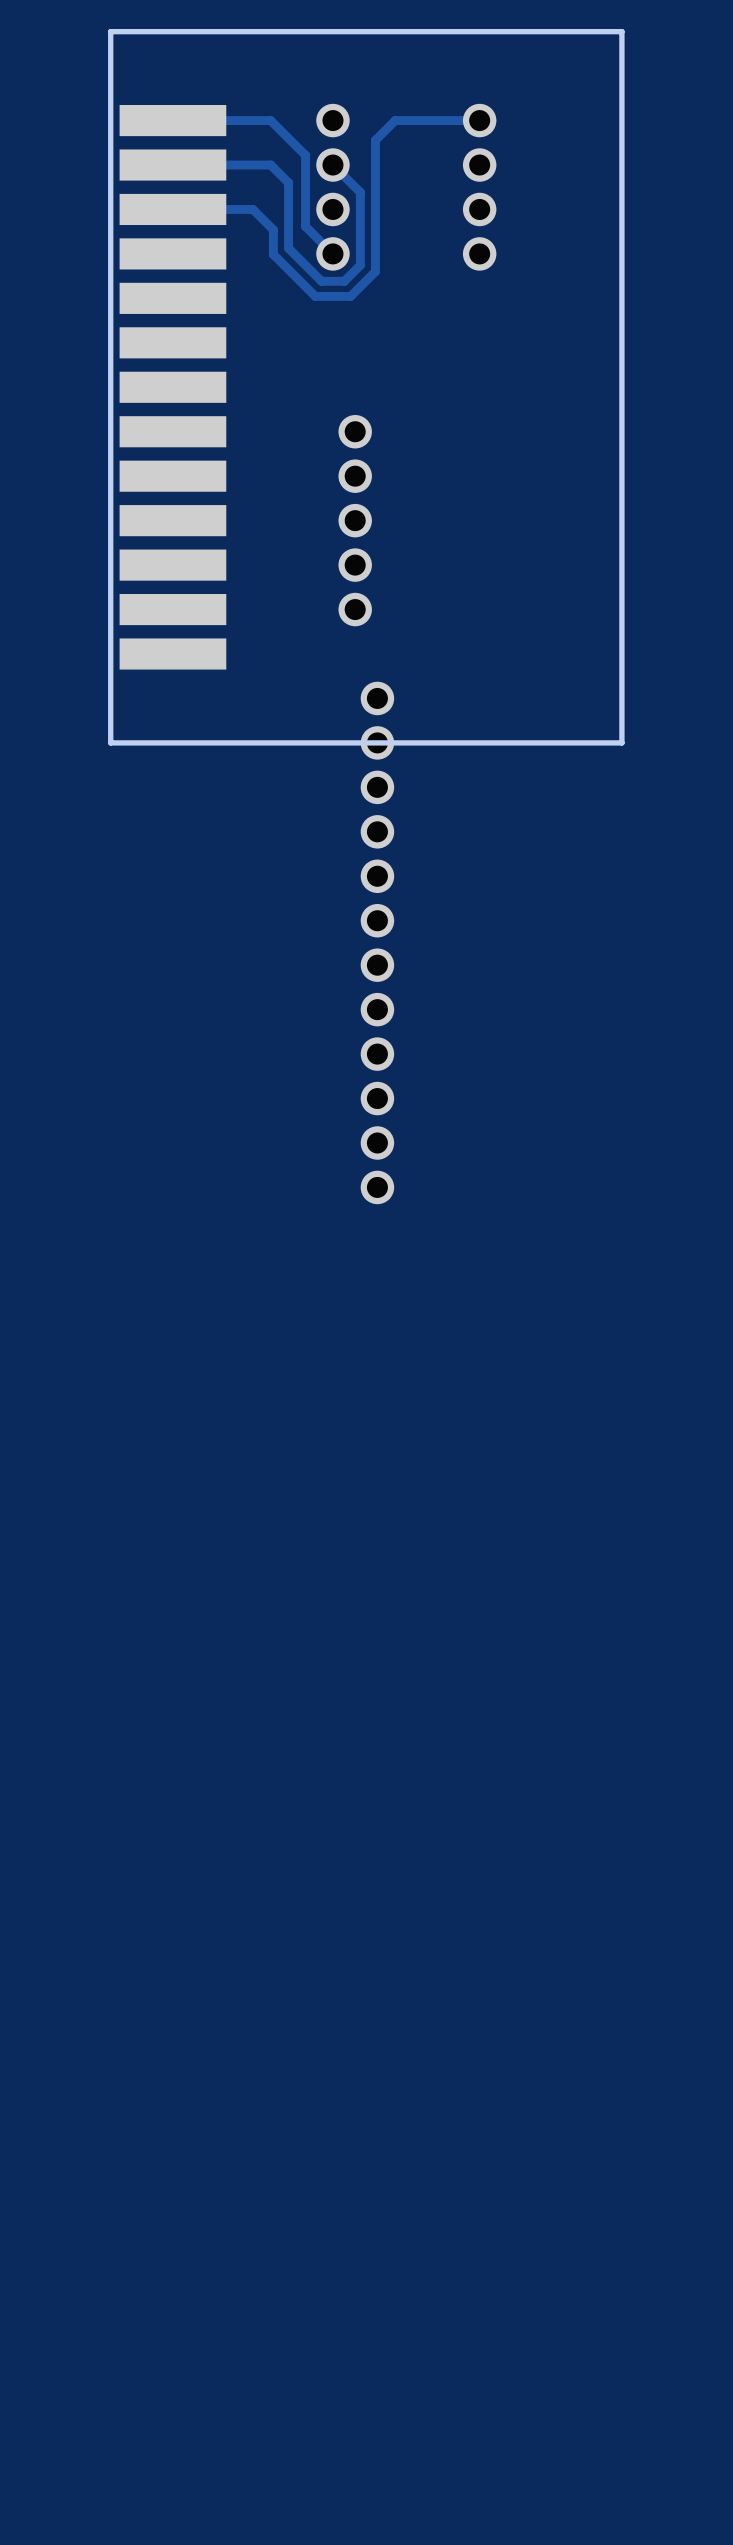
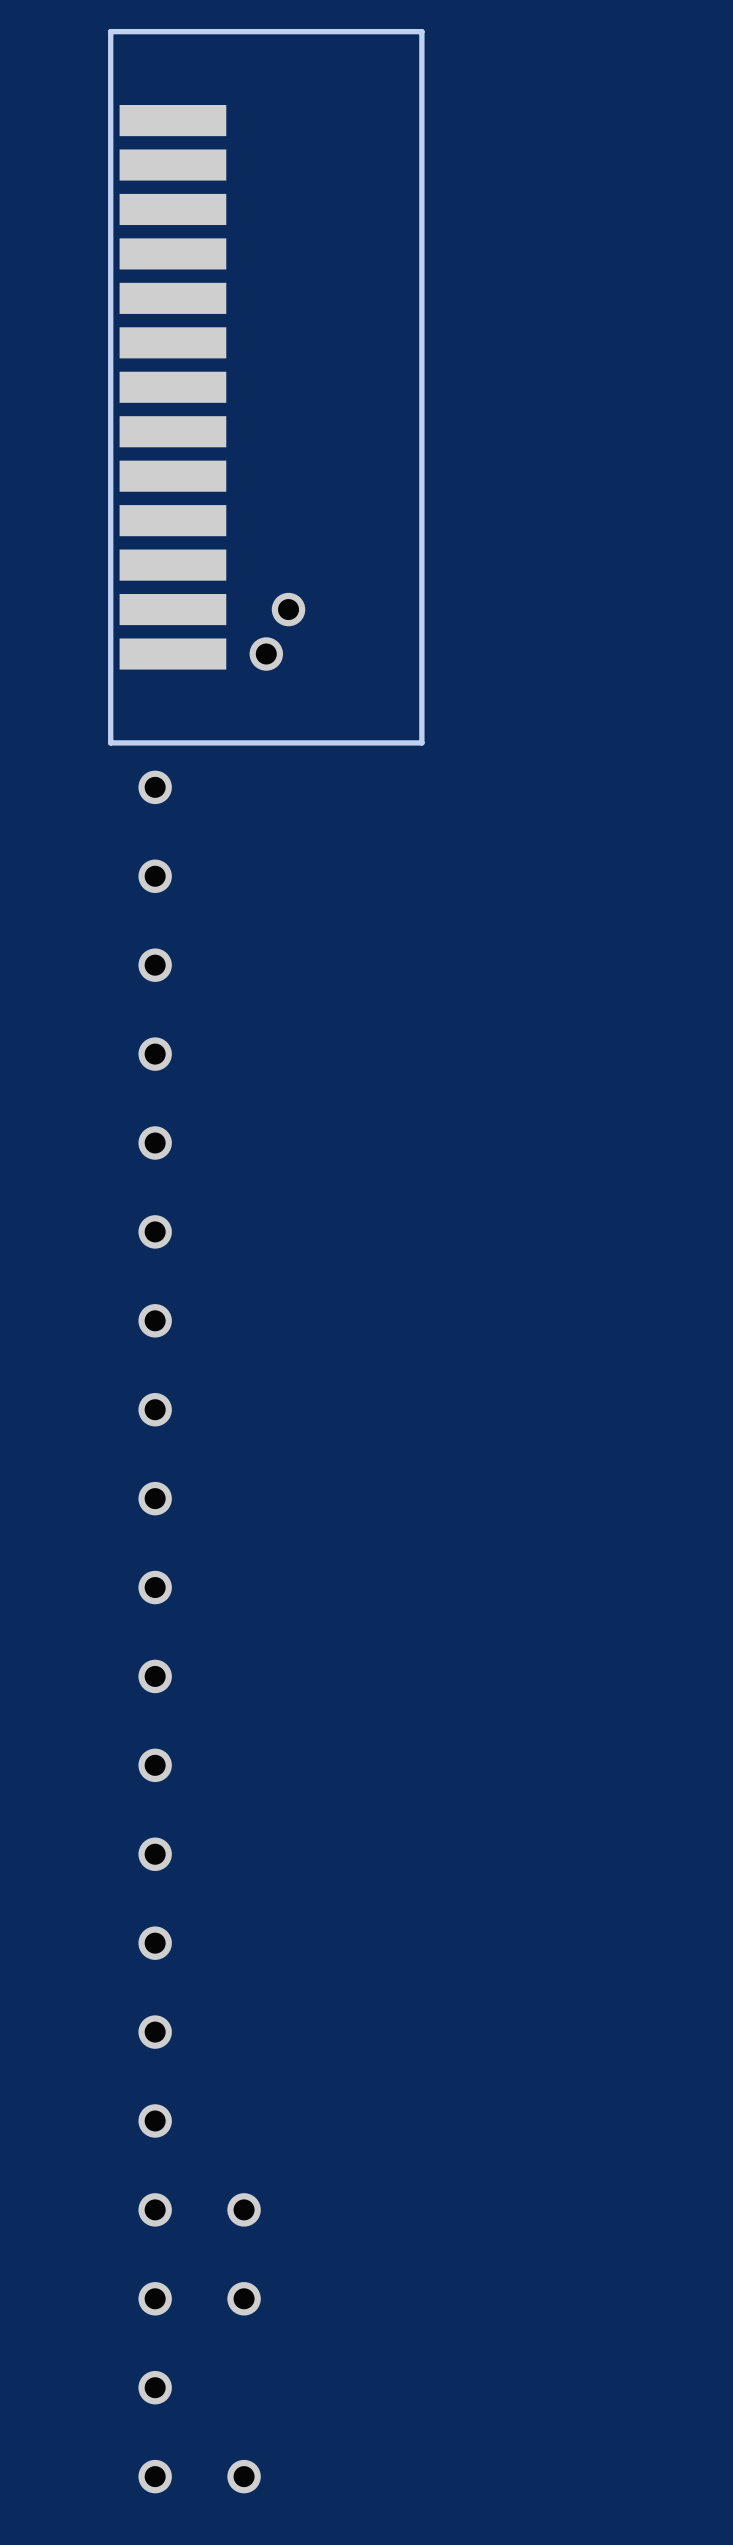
board edge: (421, 31) (621, 31) (621, 742) (421, 742) -> (421, 31) (421, 742)
track: (172, 120) (270, 120) (305, 155) (305, 226) (332, 253) -> none
part: (332, 120) -> none
track: (479, 120) (395, 120) (375, 140) (375, 271) (350, 296) (315, 296) (273, 254) (273, 229) (252, 209) (172, 209) -> none
part: (479, 120) -> none
track: (172, 165) (270, 165) (288, 182) (288, 248) (321, 281) (344, 281) (360, 265) (360, 192) (332, 165) -> none
part: (332, 165) -> none
part: (479, 165) -> none
part: (332, 209) -> none
part: (479, 209) -> none
part: (332, 253) -> none
part: (479, 253) -> none
part: (355, 431) -> none
part: (355, 476) -> none
part: (355, 520) -> none
part: (355, 565) -> none
part: none -> (288, 609)
part: (355, 609) -> none
part: none -> (266, 654)
part: (377, 698) -> none
part: (377, 742) -> none
part: none -> (155, 787)
part: (377, 787) -> none
part: (377, 831) -> none
part: none -> (155, 876)
part: (377, 876) -> none
part: (377, 920) -> none
part: none -> (155, 965)
part: (377, 965) -> none
part: (377, 1009) -> none
part: none -> (155, 1054)
part: (377, 1054) -> none
part: (377, 1098) -> none
part: none -> (155, 1143)
part: (377, 1143) -> none
part: (377, 1187) -> none
part: none -> (155, 1231)
part: none -> (155, 1320)
part: none -> (155, 1409)
part: none -> (155, 1498)
part: none -> (155, 1587)
part: none -> (155, 1676)
part: none -> (155, 1765)
part: none -> (155, 1854)
part: none -> (155, 1943)
part: none -> (155, 2032)
part: none -> (155, 2120)
part: none -> (155, 2209)
part: none -> (244, 2209)
part: none -> (155, 2298)
part: none -> (244, 2298)
part: none -> (155, 2387)
part: none -> (155, 2476)
part: none -> (244, 2476)

